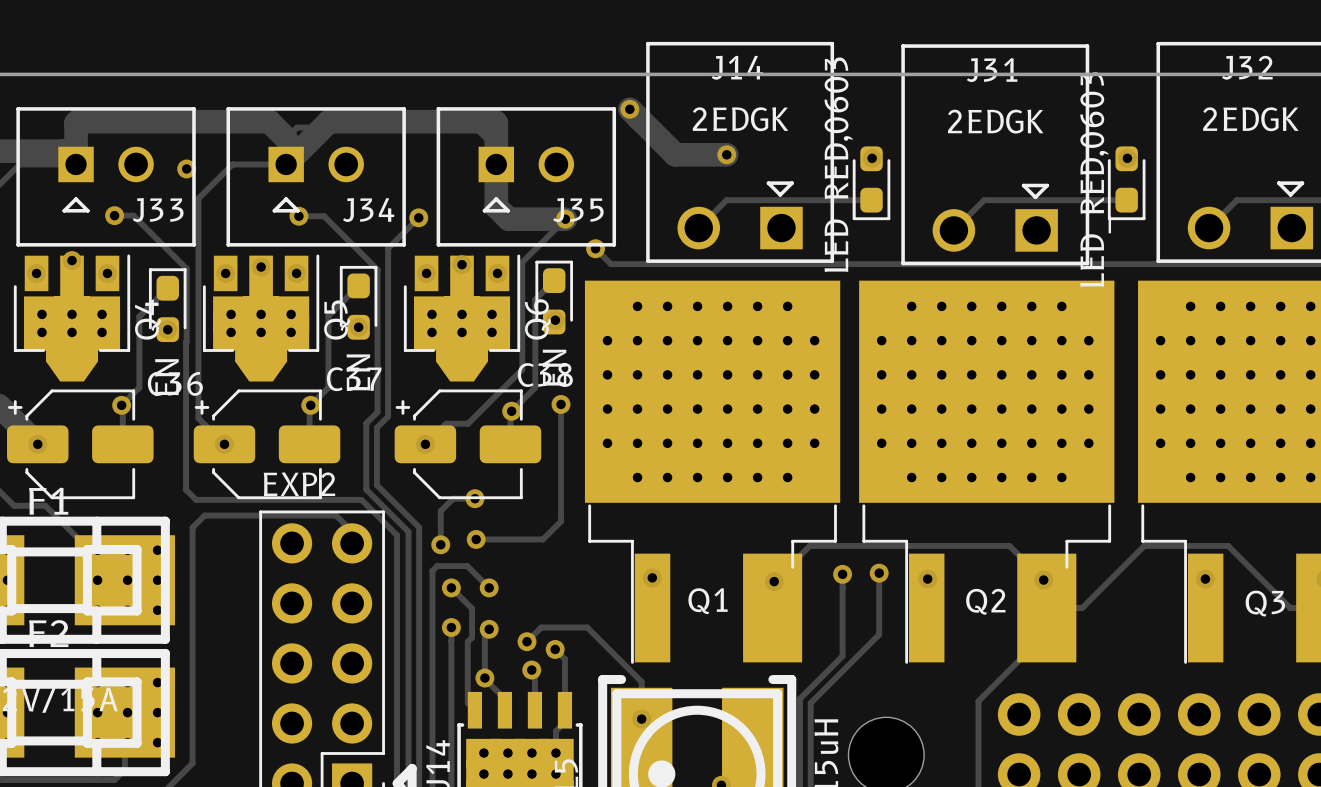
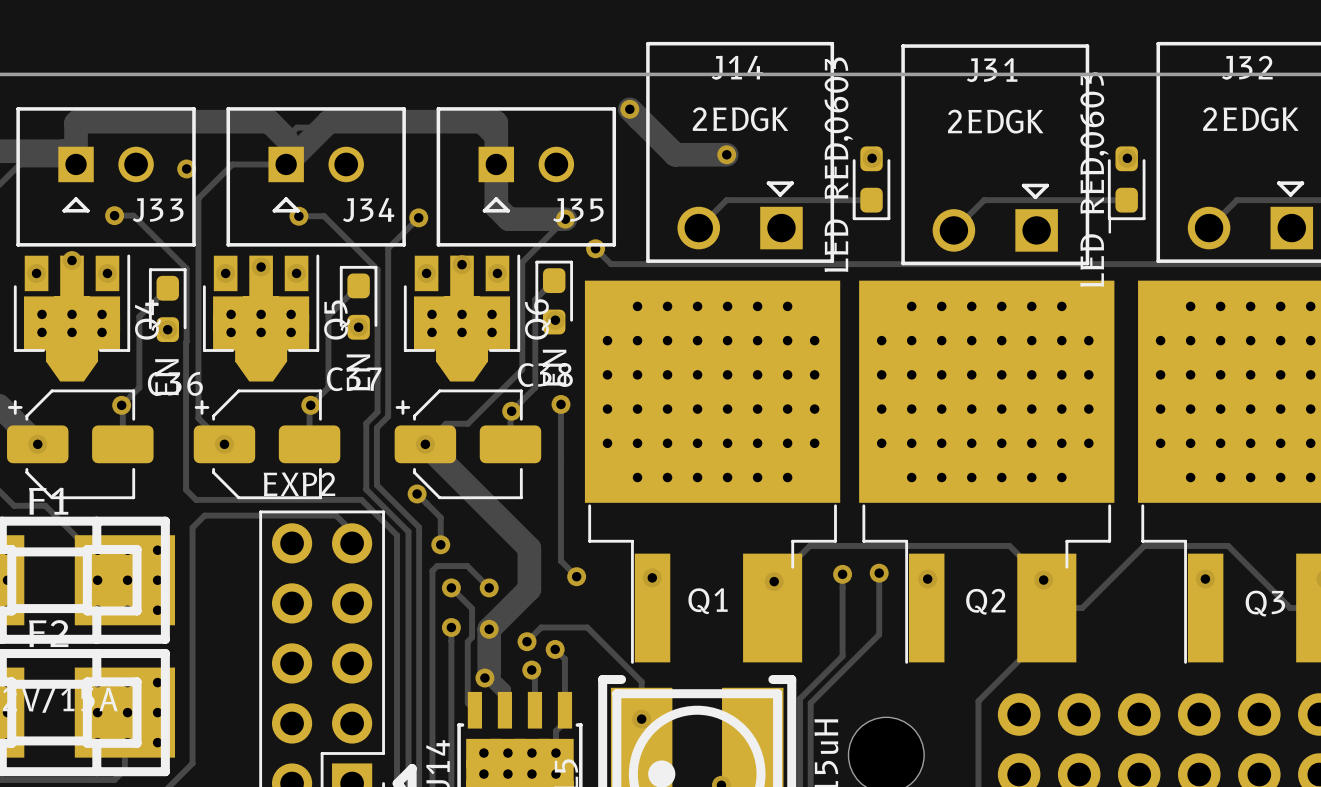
track: none -> (425, 444) (529, 548) (529, 589) (489, 629) (489, 673) (504, 689) (504, 710)
via: none -> (417, 493)
track: (475, 498) (453, 498) (440, 511) (440, 517) -> (417, 493) (440, 517)
via: (475, 498) -> none
track: (561, 521) (542, 539) (476, 539) -> (561, 521) (561, 561) (576, 576)
via: (476, 539) -> none
via: none -> (576, 576)

